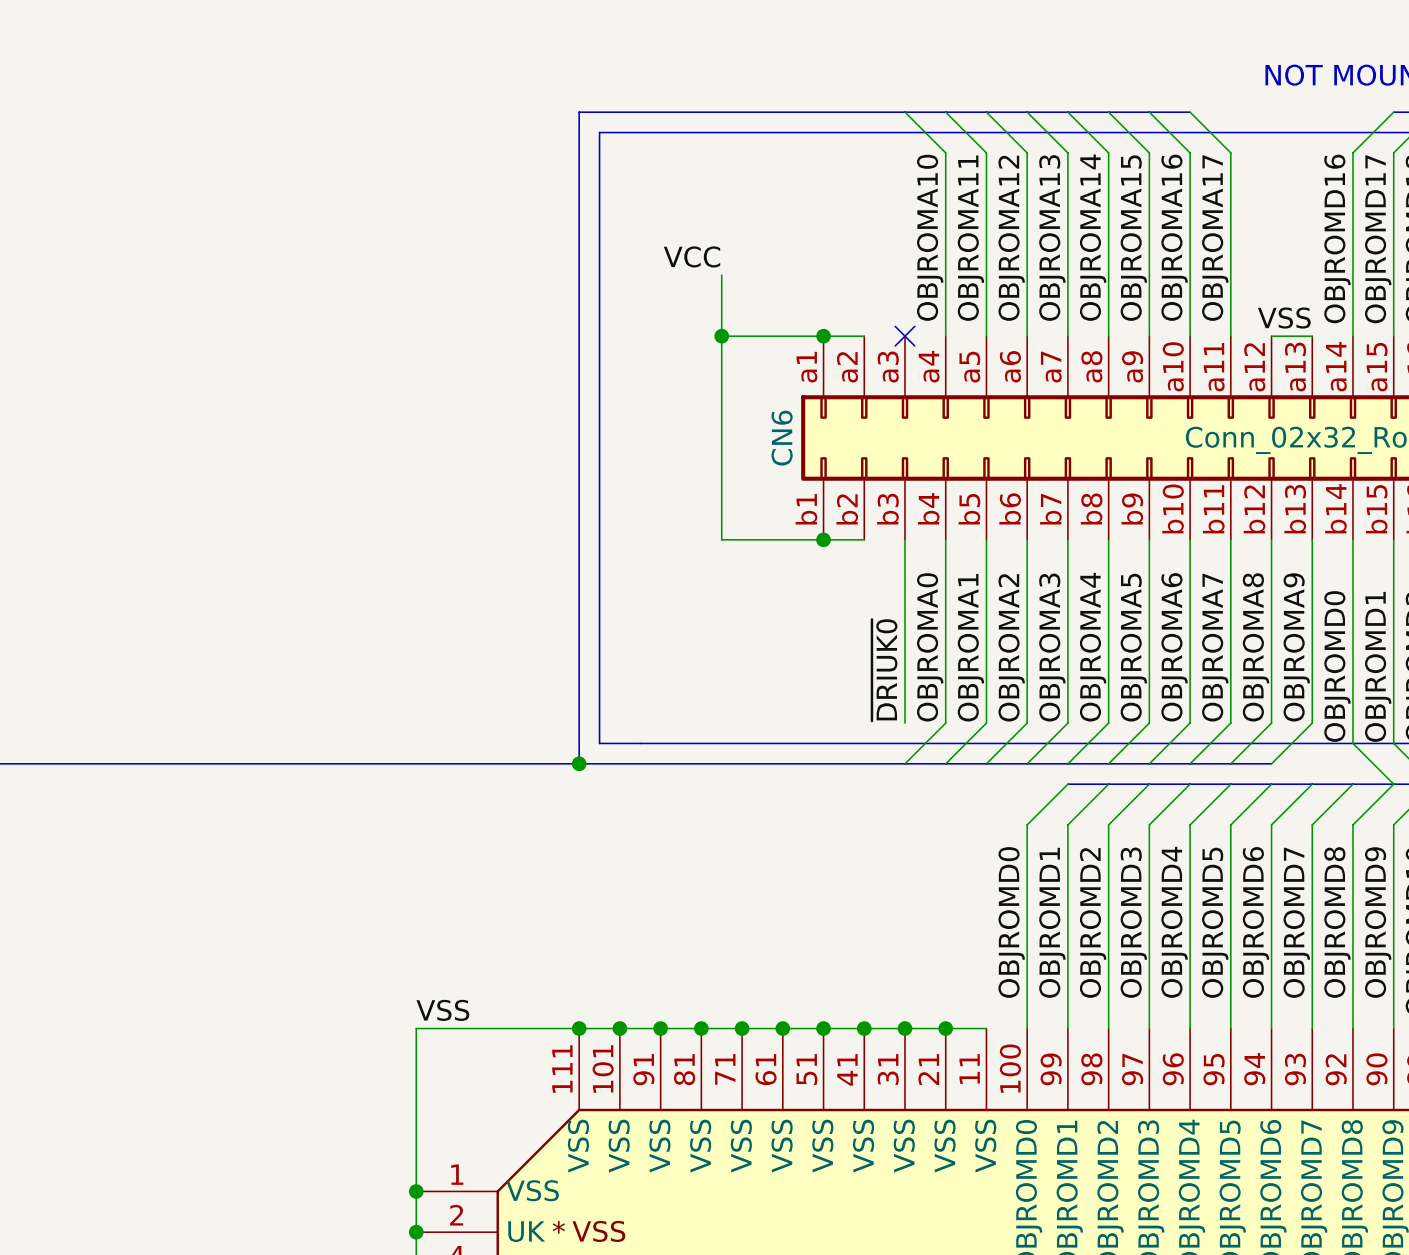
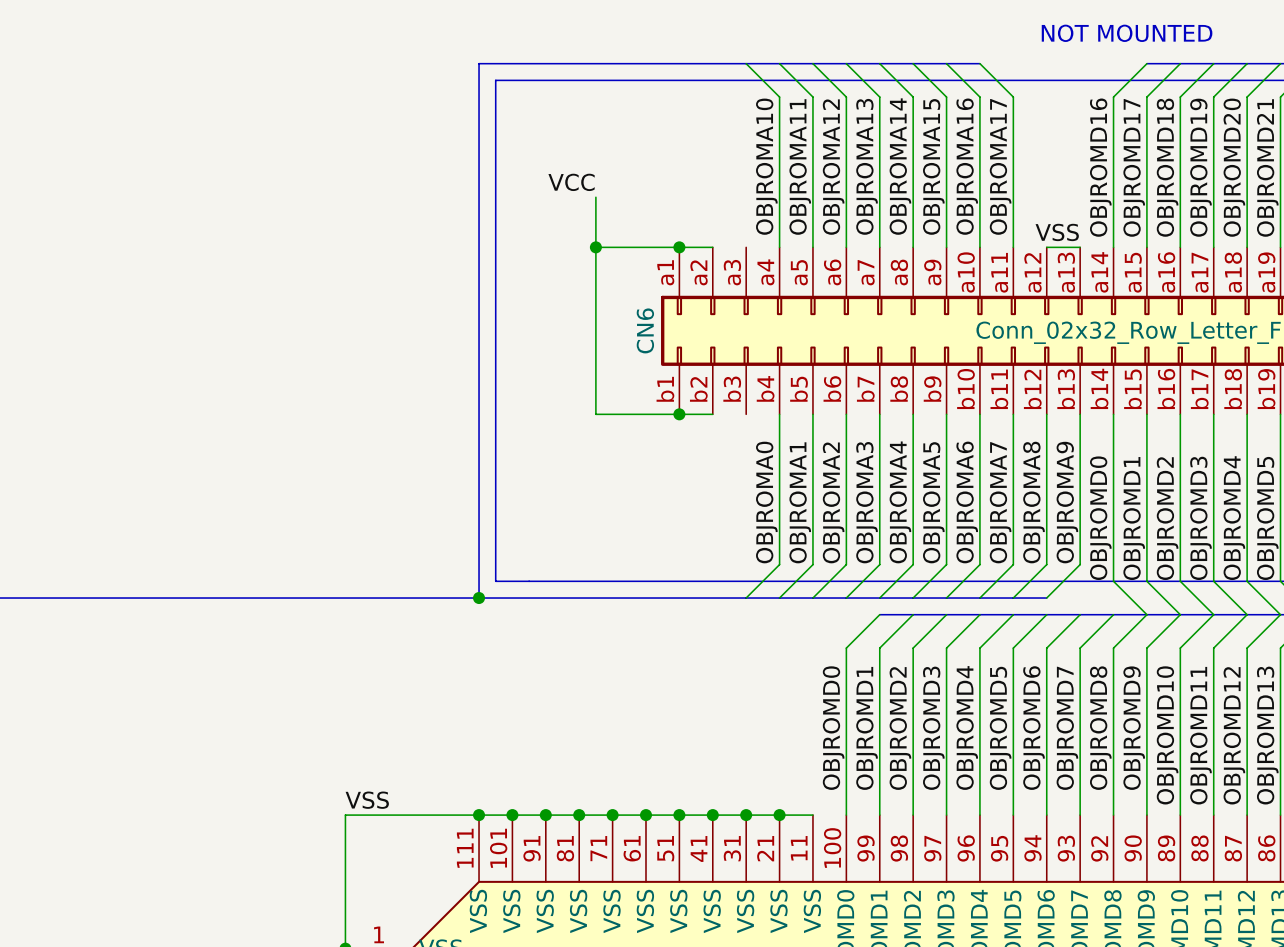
no-connect mark: (905, 336) -> none
wire: (905, 539) (905, 723) -> none
label: ~{DRIUK0} (884, 670) -> none

